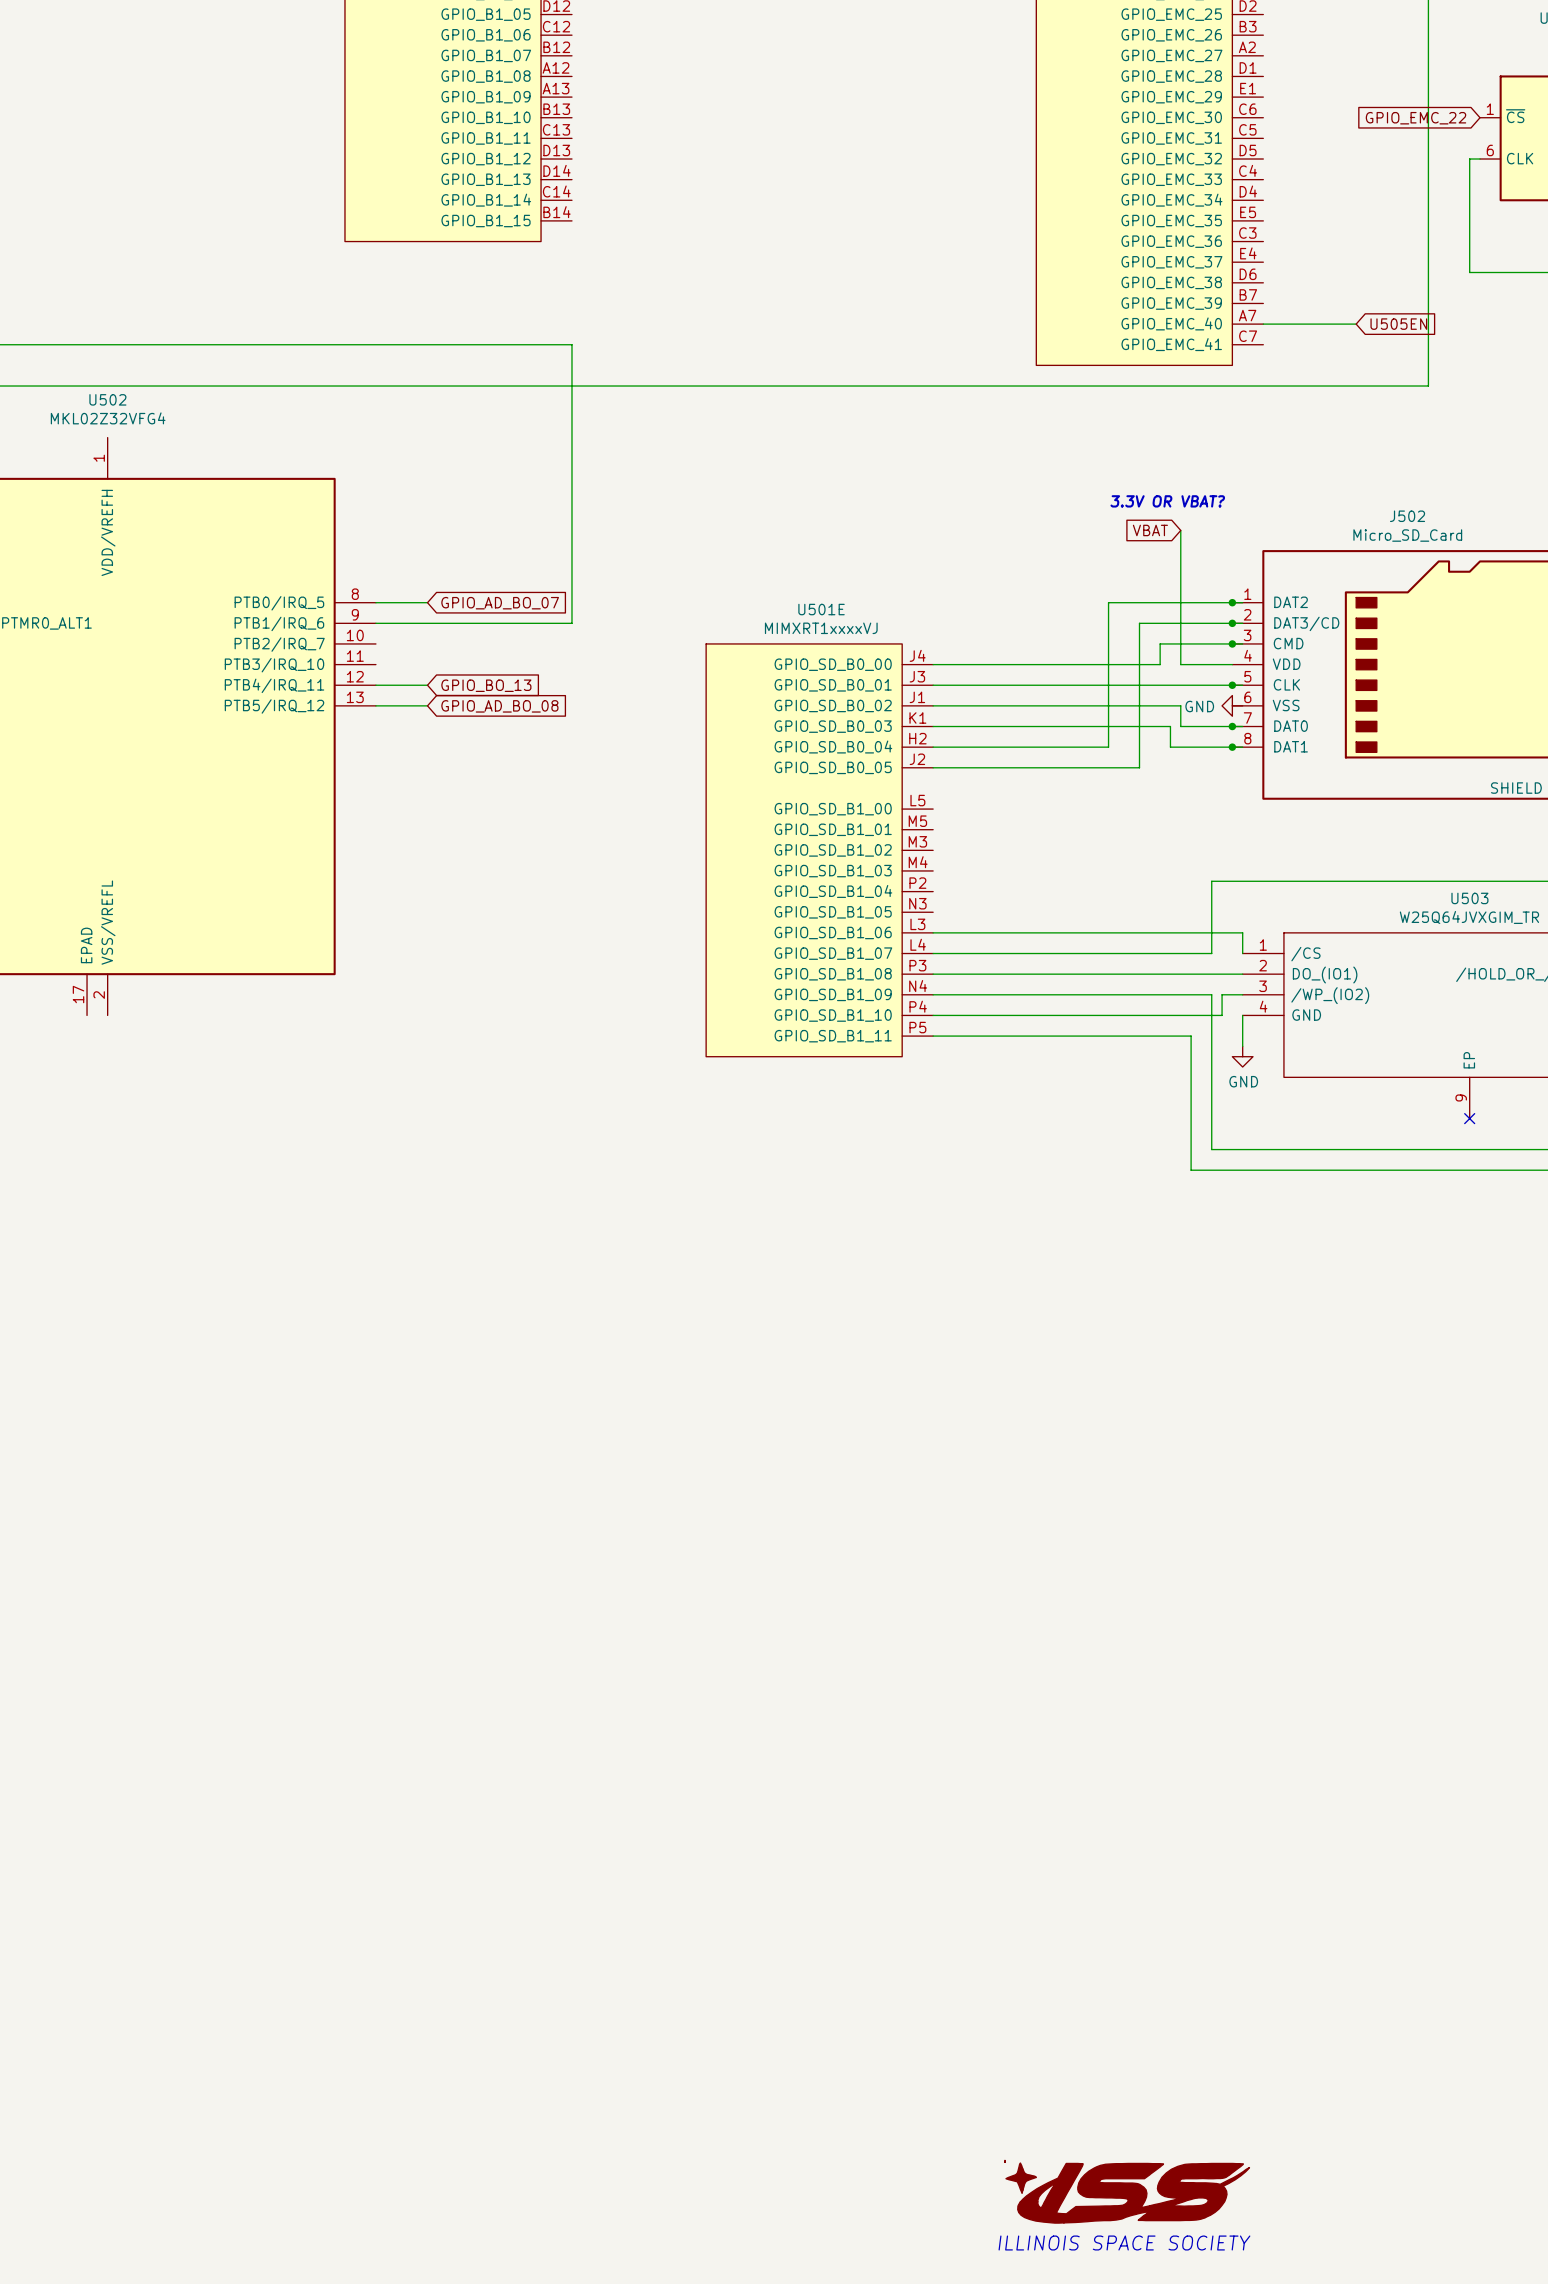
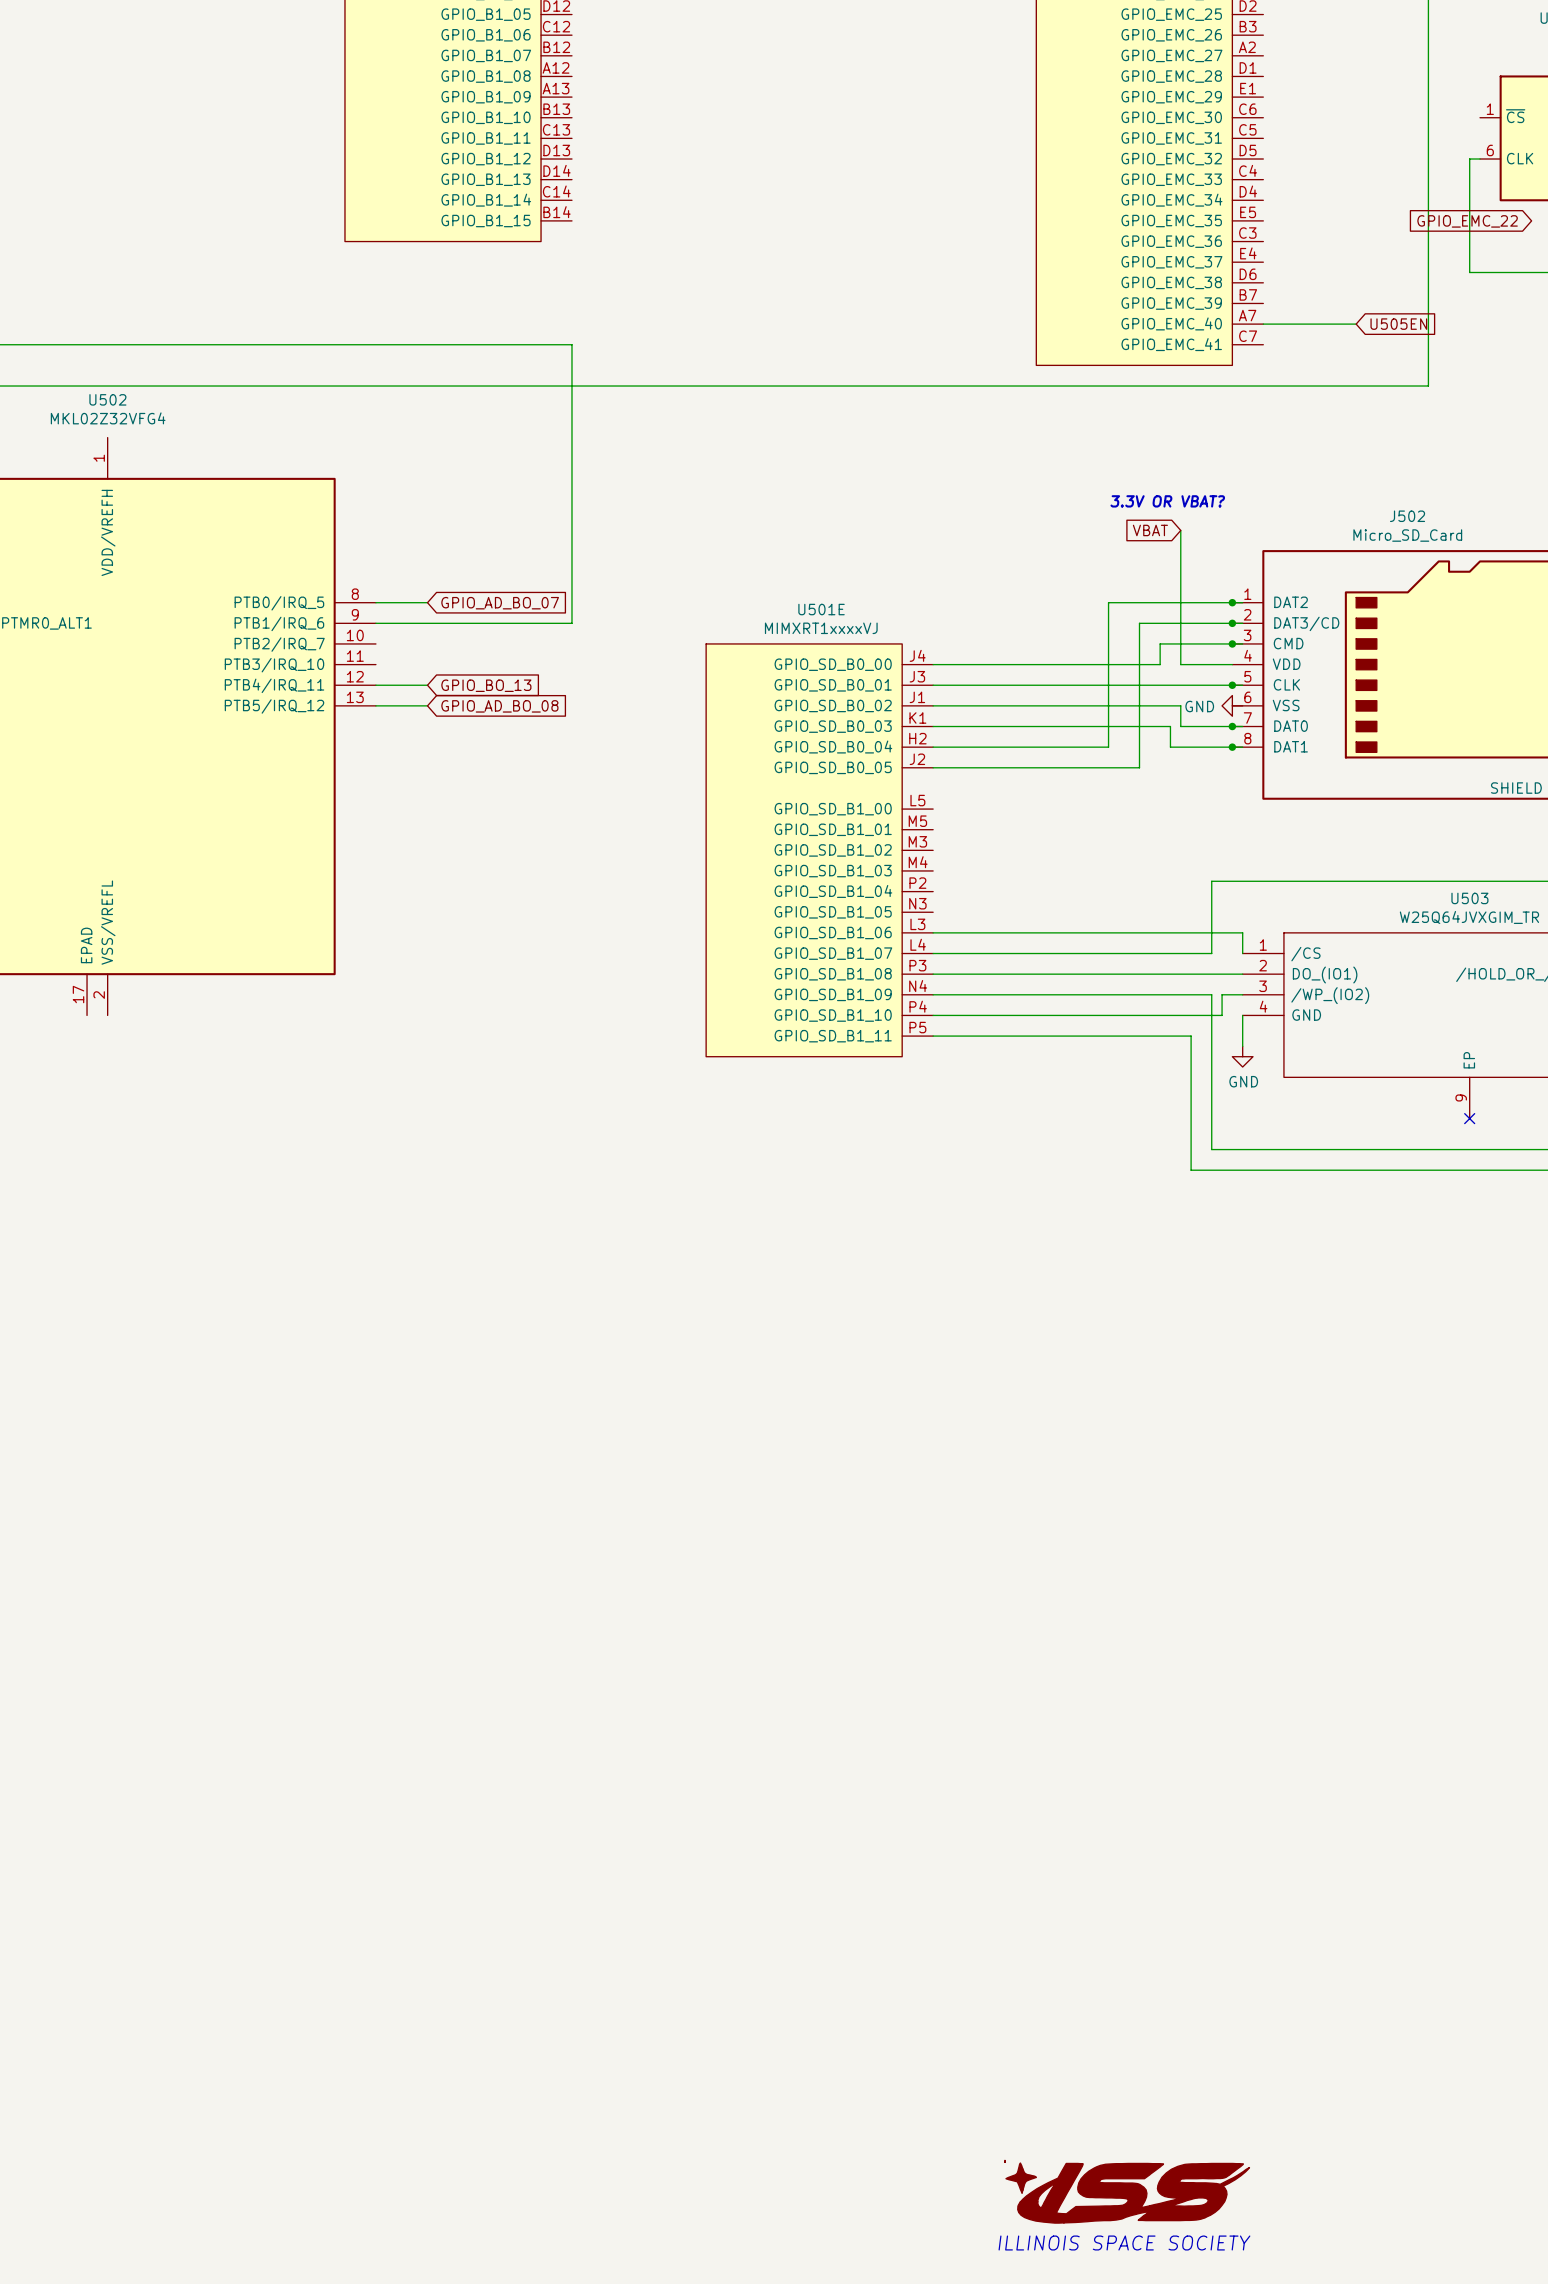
global label position: GPIO_EMC_22 (1415, 118) -> GPIO_EMC_22 (1467, 221)

